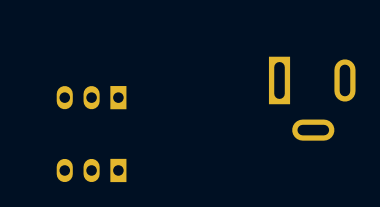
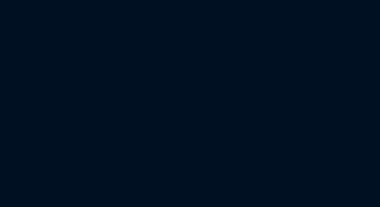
part: (91, 97) -> none
part: (312, 98) -> none
part: (91, 170) -> none

